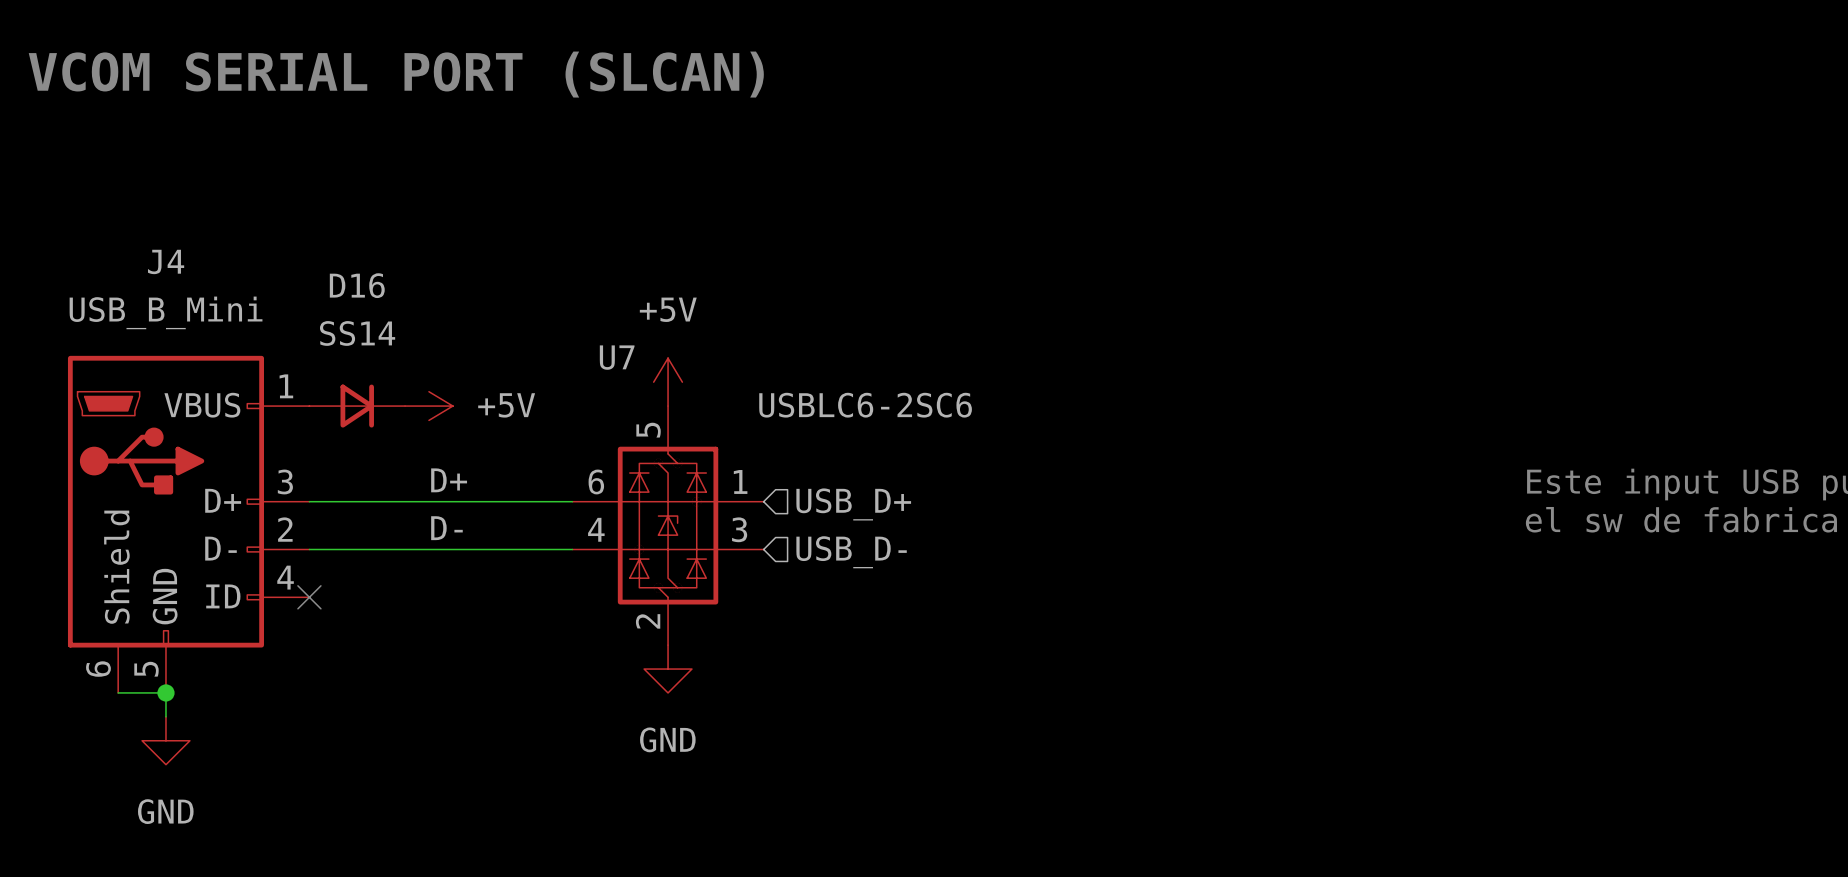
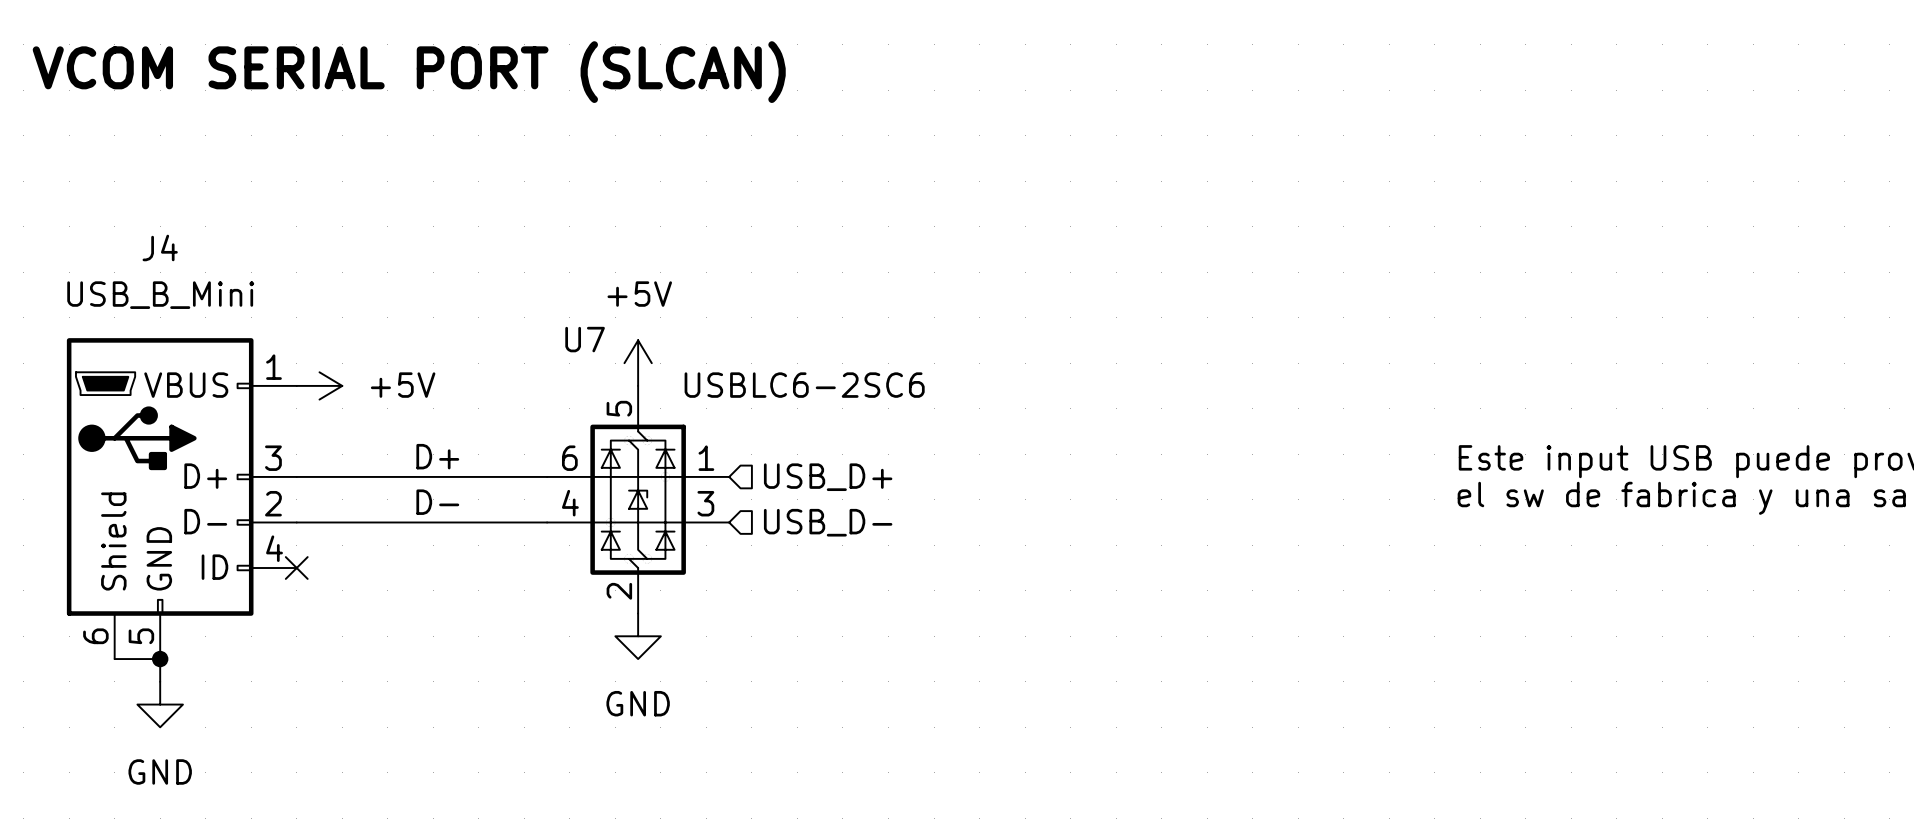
D16: SS14 (357, 406) -> none
power symbol position: +5V (428, 406) -> +5V (319, 385)

